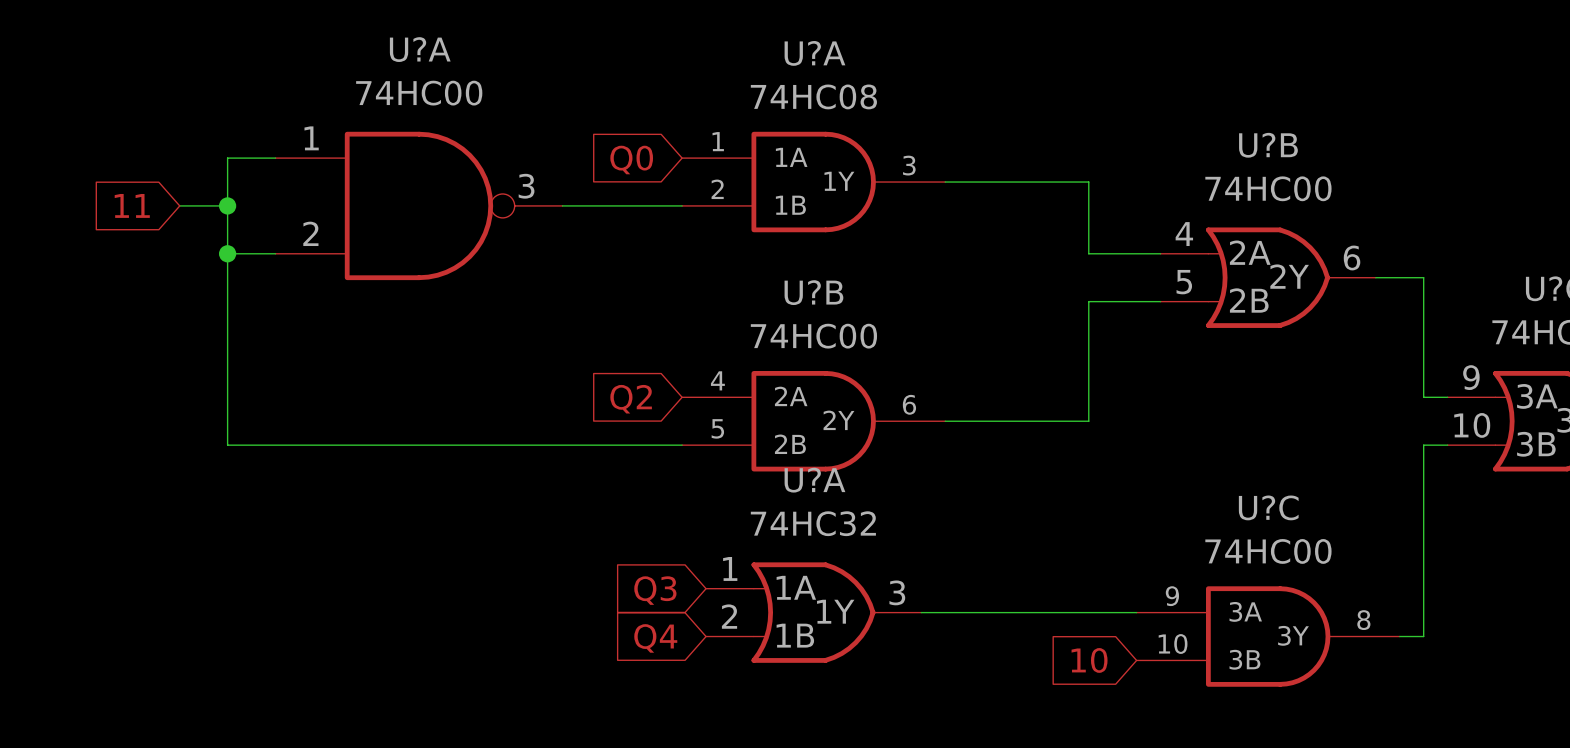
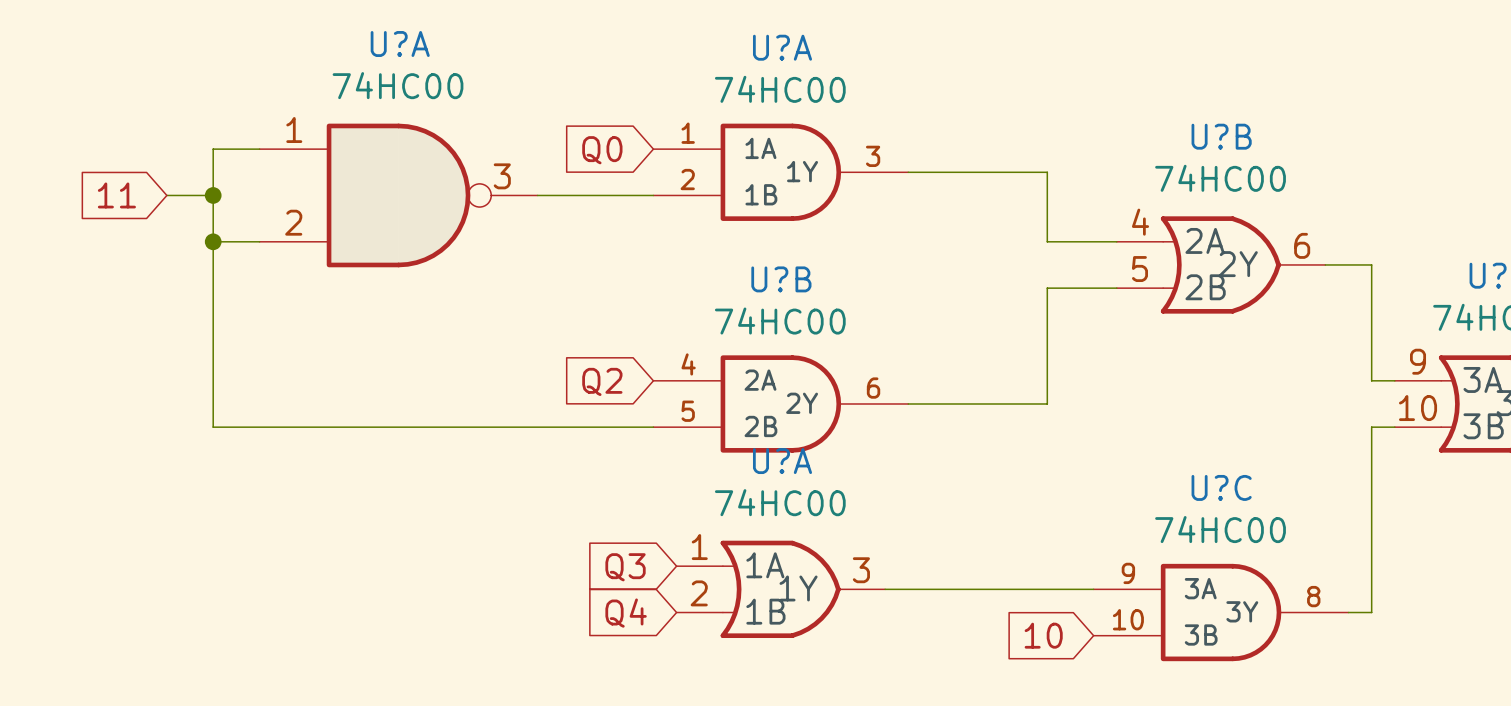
U?A value: 74HC08 (813, 96) -> 74HC00 (780, 89)
U?A value: 74HC32 (813, 523) -> 74HC00 (780, 502)

